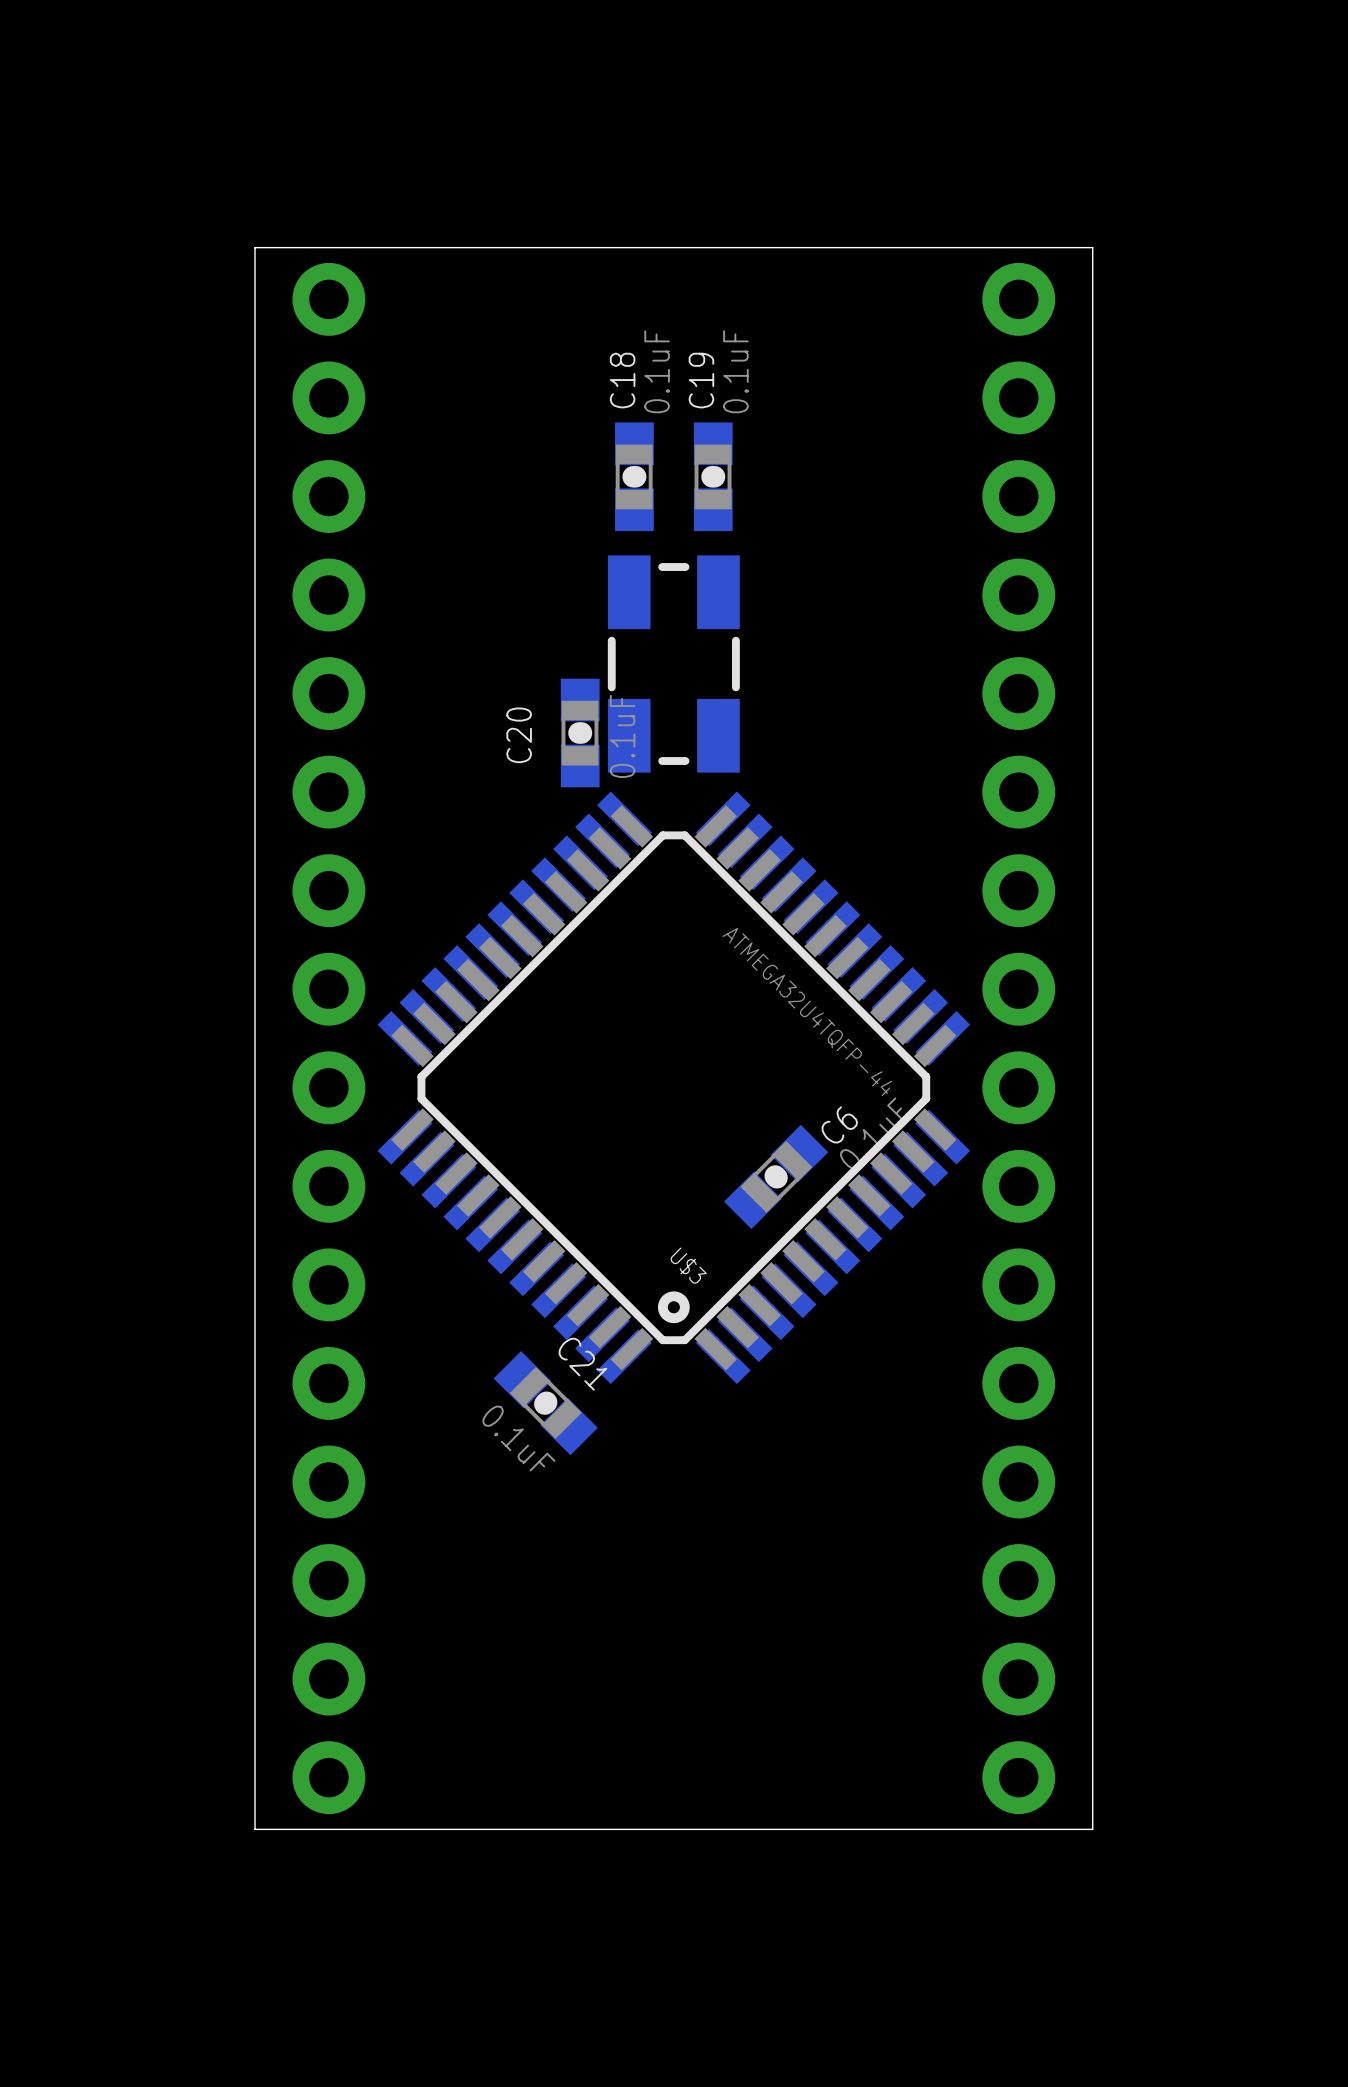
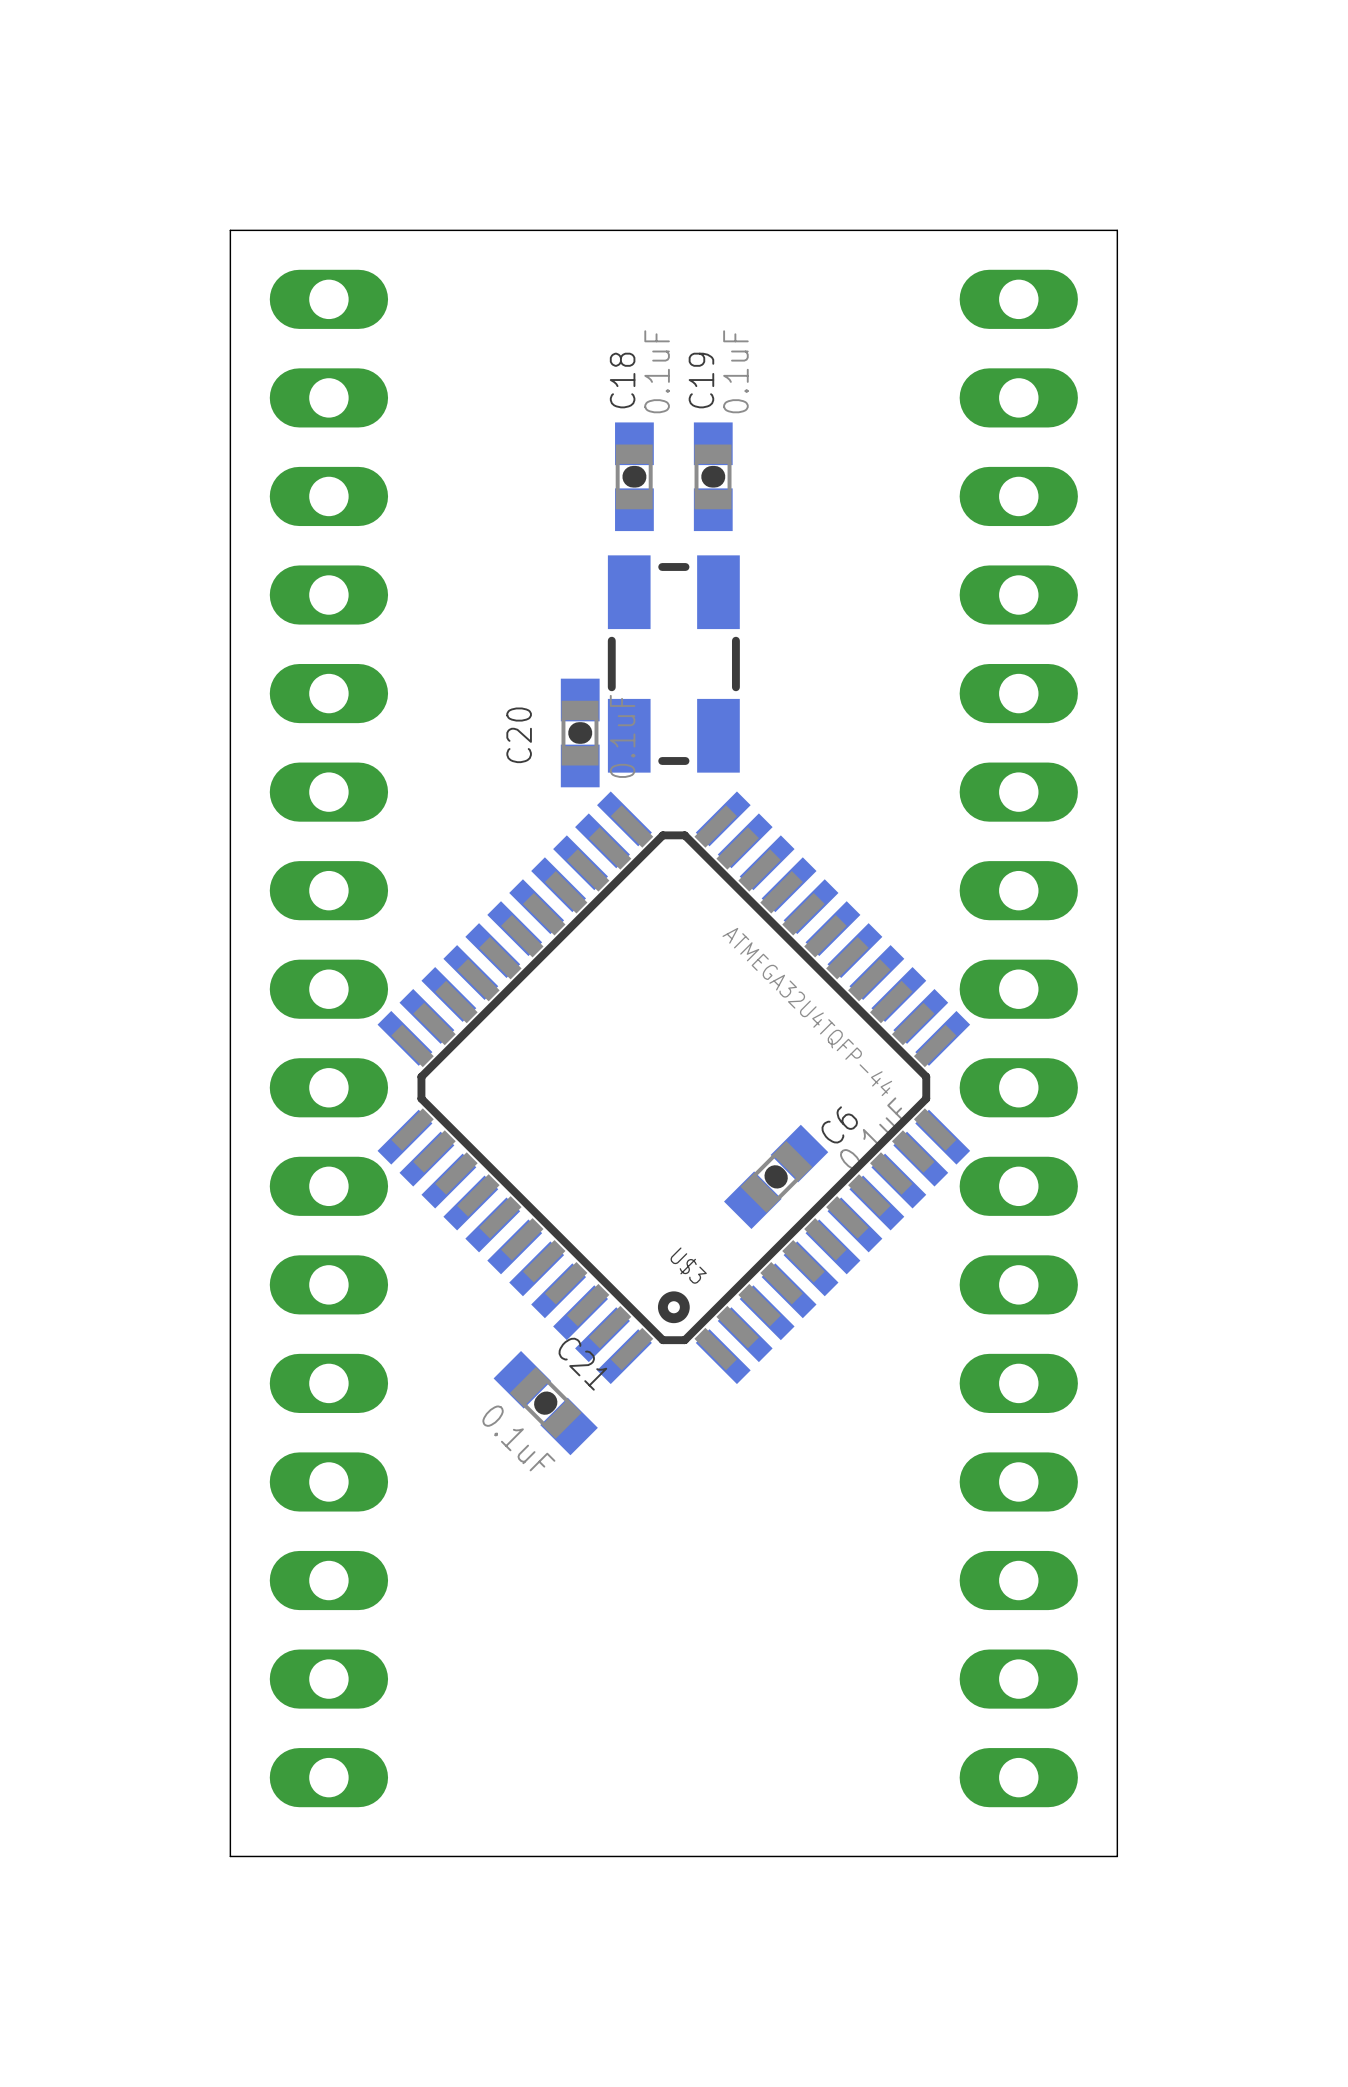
board edge: (1092, 247) (255, 247) (255, 1829) (1092, 1829) (1092, 247) -> (1117, 230) (1117, 1856) (230, 1856) (230, 230) (1117, 230)
part footprint: [292, 262, 366, 1815] -> [269, 269, 389, 1808]
part footprint: [982, 262, 1056, 1815] -> [959, 269, 1078, 1808]

